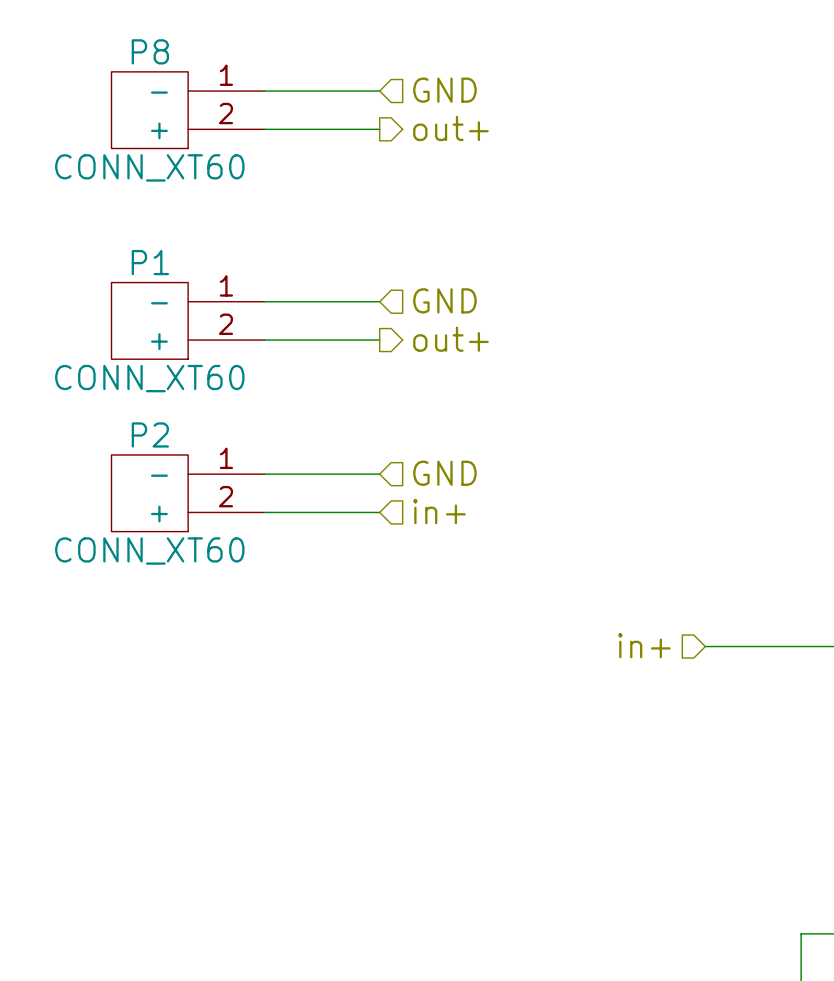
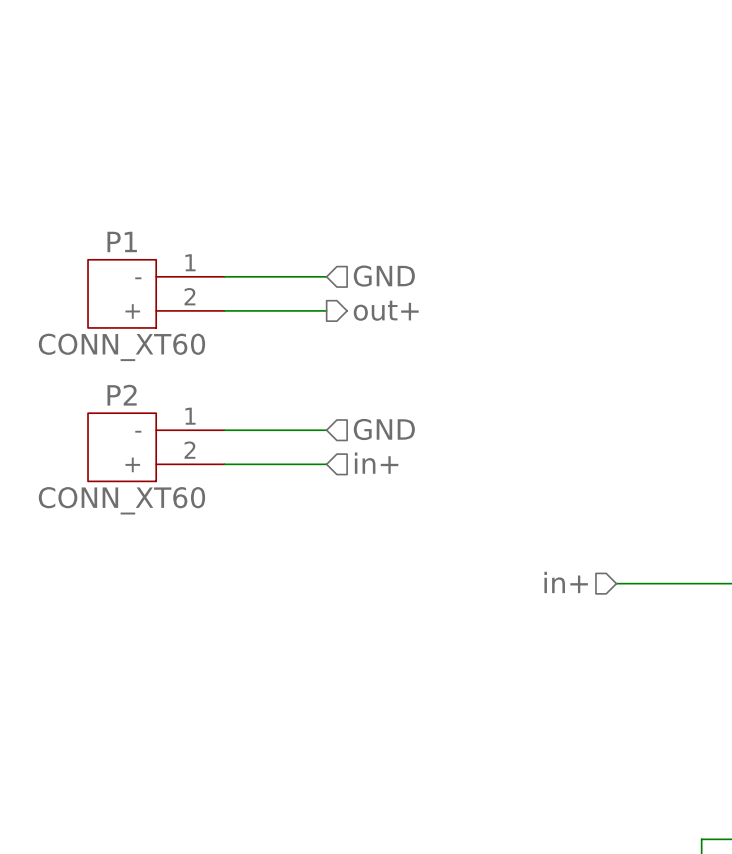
hierarchical label: GND (444, 90) -> none
wire: (264, 91) (379, 91) -> none
P8: CONN_XT60 (188, 110) -> none
hierarchical label: out+ (450, 128) -> none
wire: (264, 129) (379, 129) -> none

